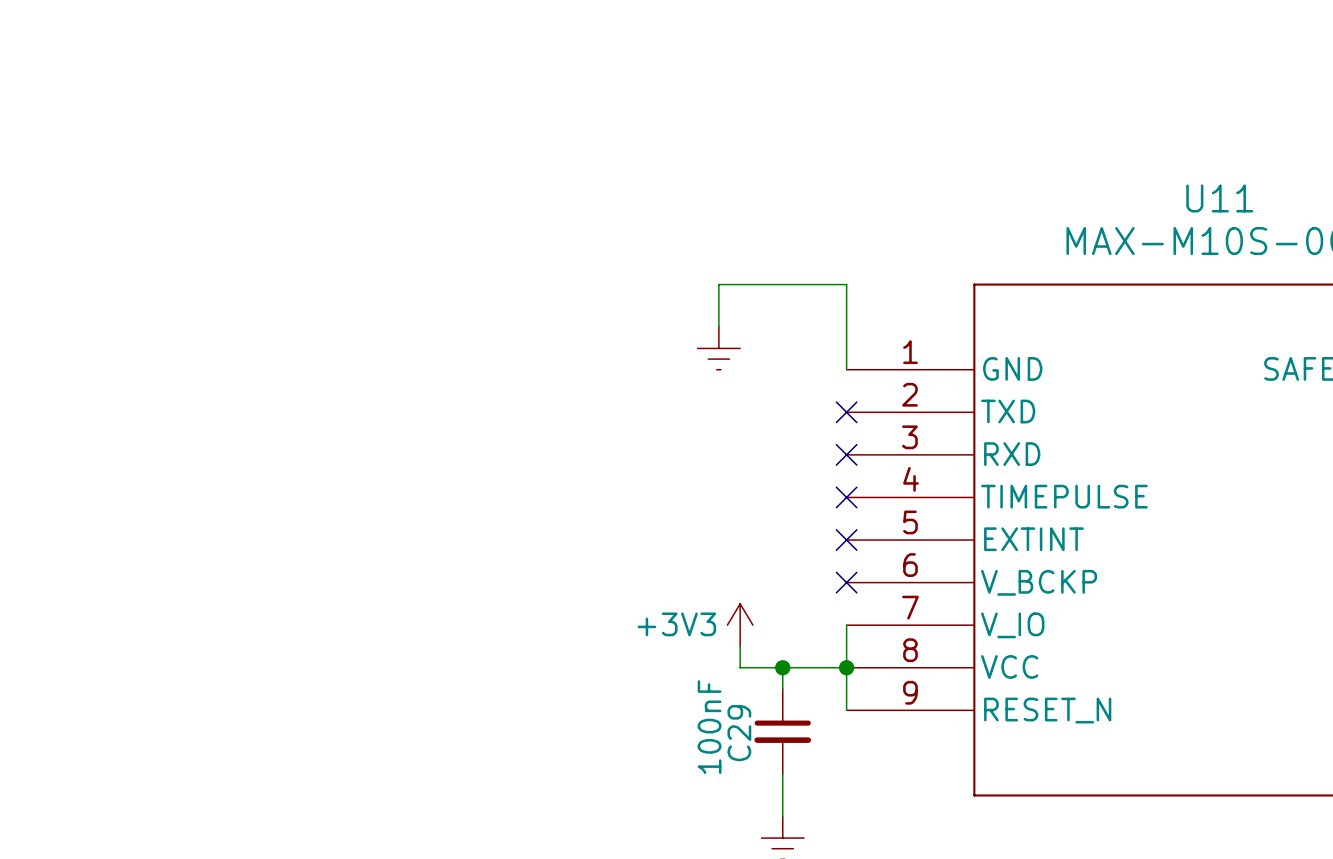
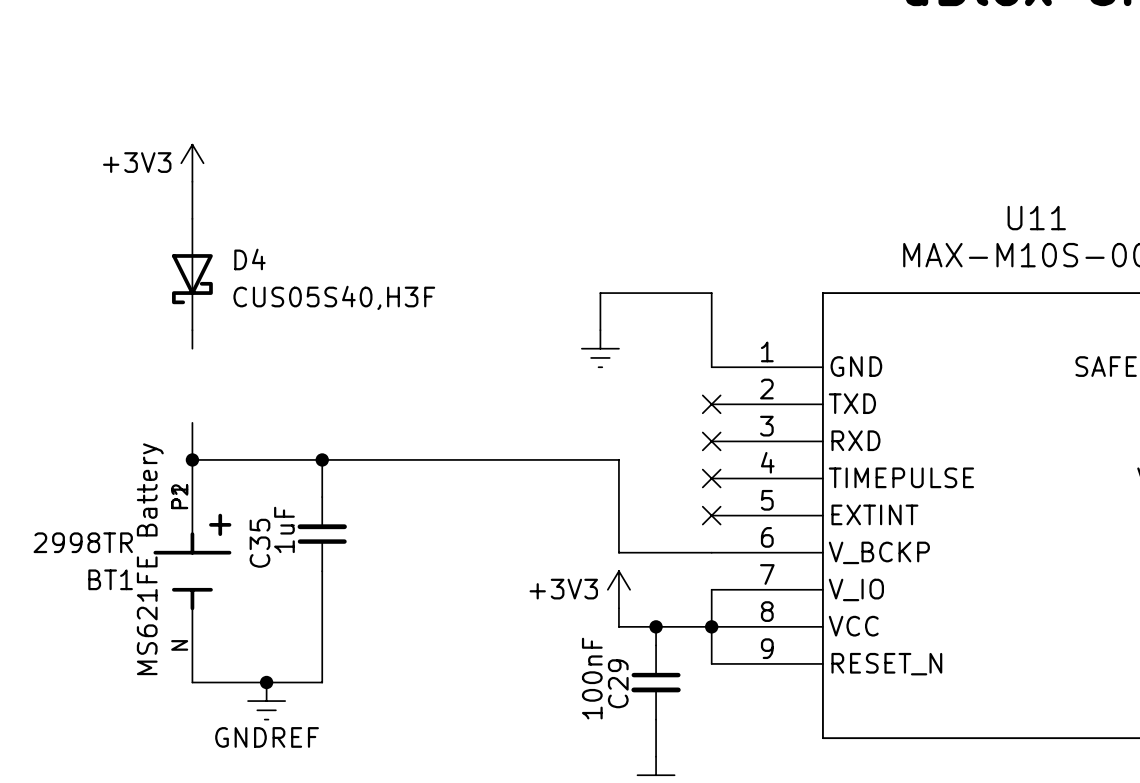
power symbol: none -> +3V3 (192, 163)
wire: none -> (192, 181) (192, 218)
D4: none -> CUS05S40,H3F (192, 274)
wire: none -> (192, 330) (192, 348)
wire: none -> (192, 422) (192, 459) (618, 459) (618, 552) (711, 552)
junction: none -> (192, 459)
wire: none -> (322, 459) (322, 497)
junction: none -> (322, 459)
C35: none -> 1uF (322, 534)
no-connect mark: (846, 582) -> none
BT1: none -> 2998TR (192, 571)
wire: none -> (322, 571) (322, 682) (192, 682)
junction: none -> (266, 682)
power symbol: none -> GNDREF (266, 701)

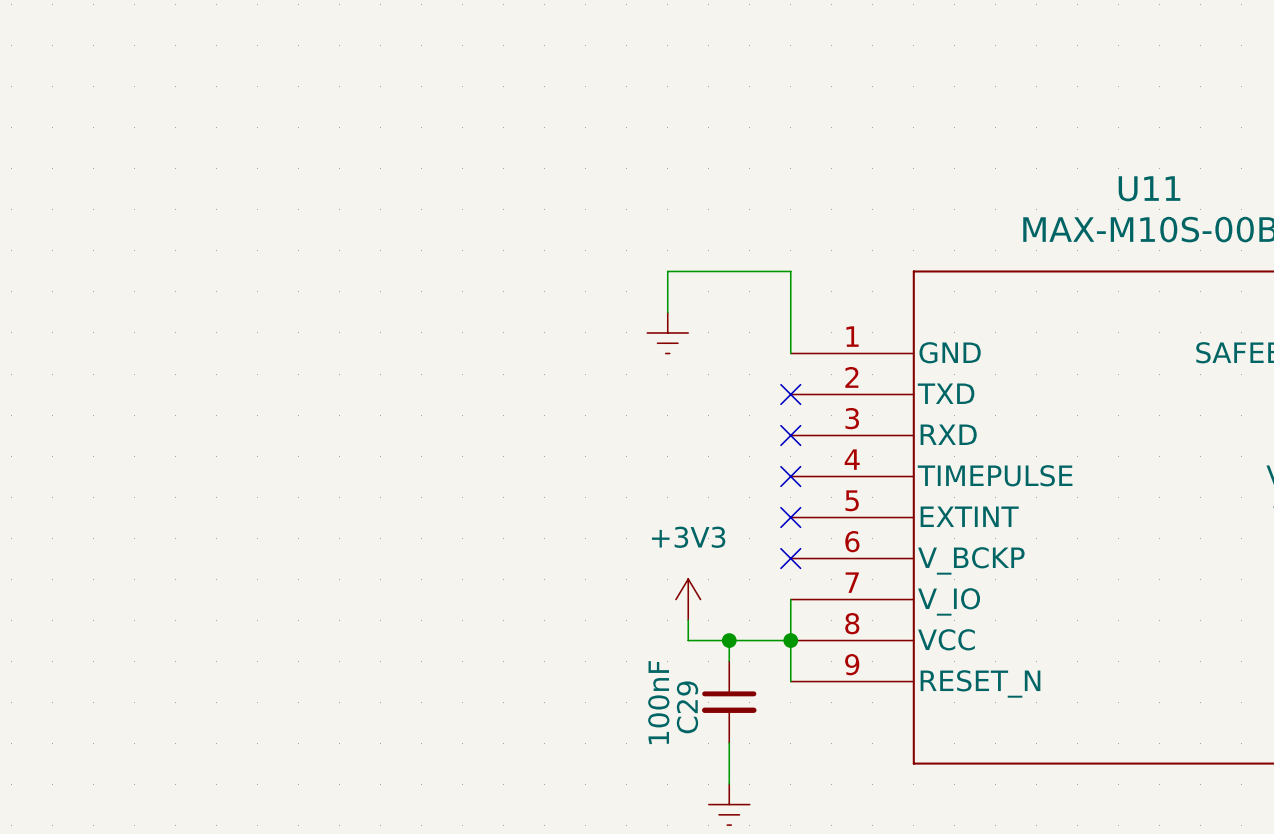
power symbol: +3V3 (192, 163) -> none
wire: (192, 181) (192, 218) -> none
D4: CUS05S40,H3F (192, 274) -> none
wire: (192, 330) (192, 348) -> none
wire: (192, 422) (192, 459) (618, 459) (618, 552) (711, 552) -> none
junction: (192, 459) -> none
wire: (322, 459) (322, 497) -> none
junction: (322, 459) -> none
C35: 1uF (322, 534) -> none
no-connect mark: none -> (790, 558)
BT1: 2998TR (192, 571) -> none
wire: (322, 571) (322, 682) (192, 682) -> none
power symbol text position: +3V3 (563, 589) -> +3V3 (688, 537)
junction: (266, 682) -> none
power symbol: GNDREF (266, 701) -> none

